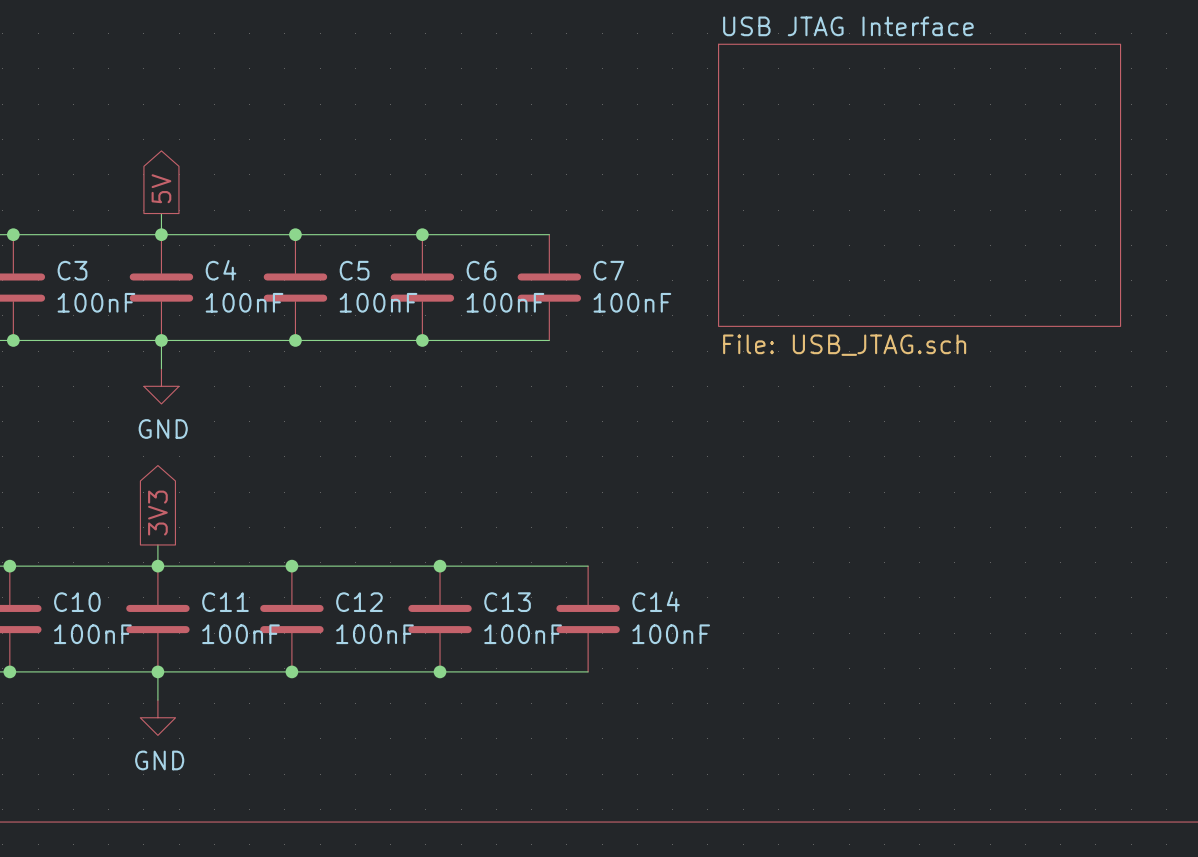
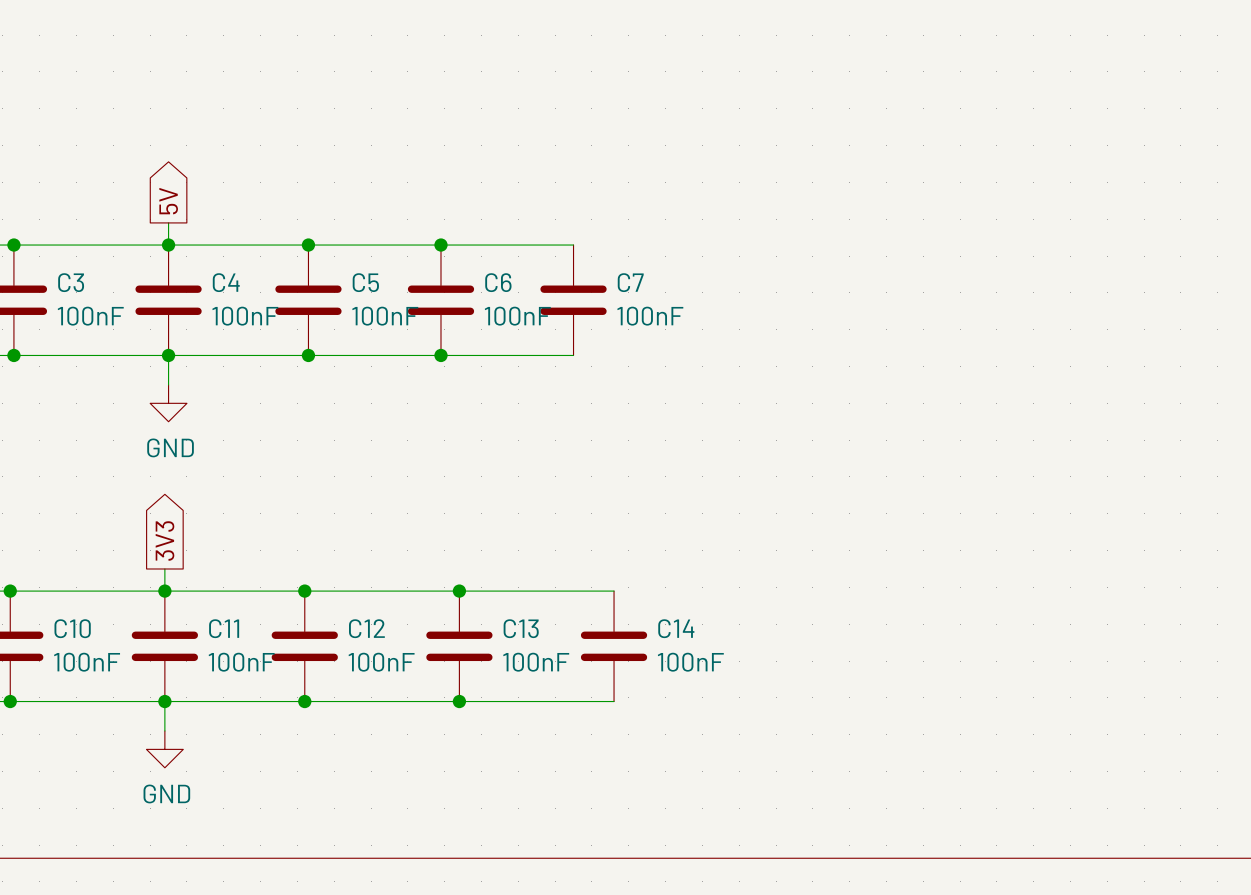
sheet USB JTAG Interface: File: USB_JTAG.sch (919, 185) -> none

